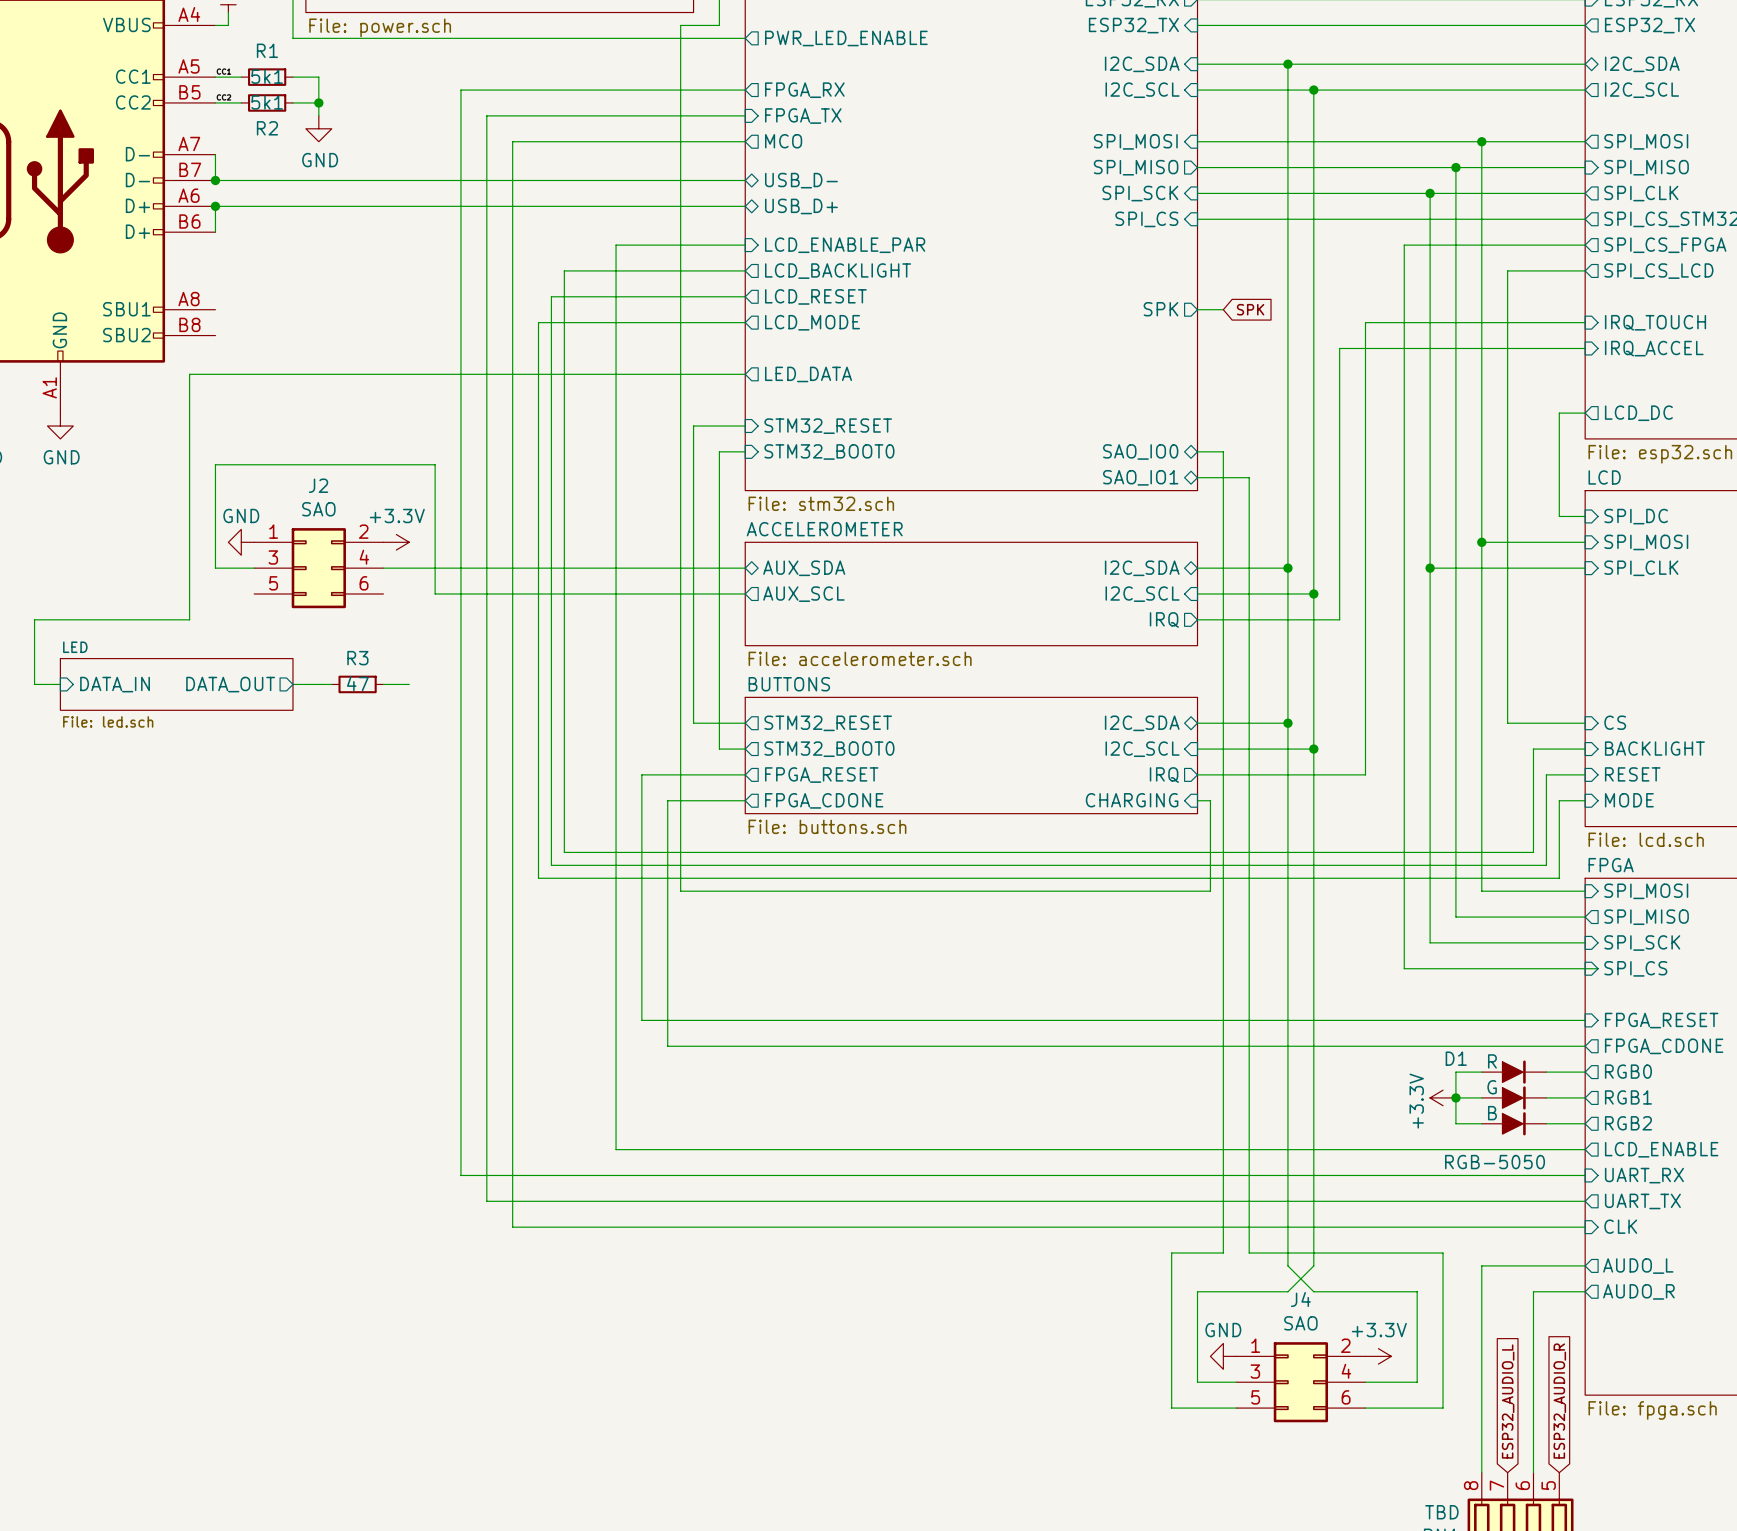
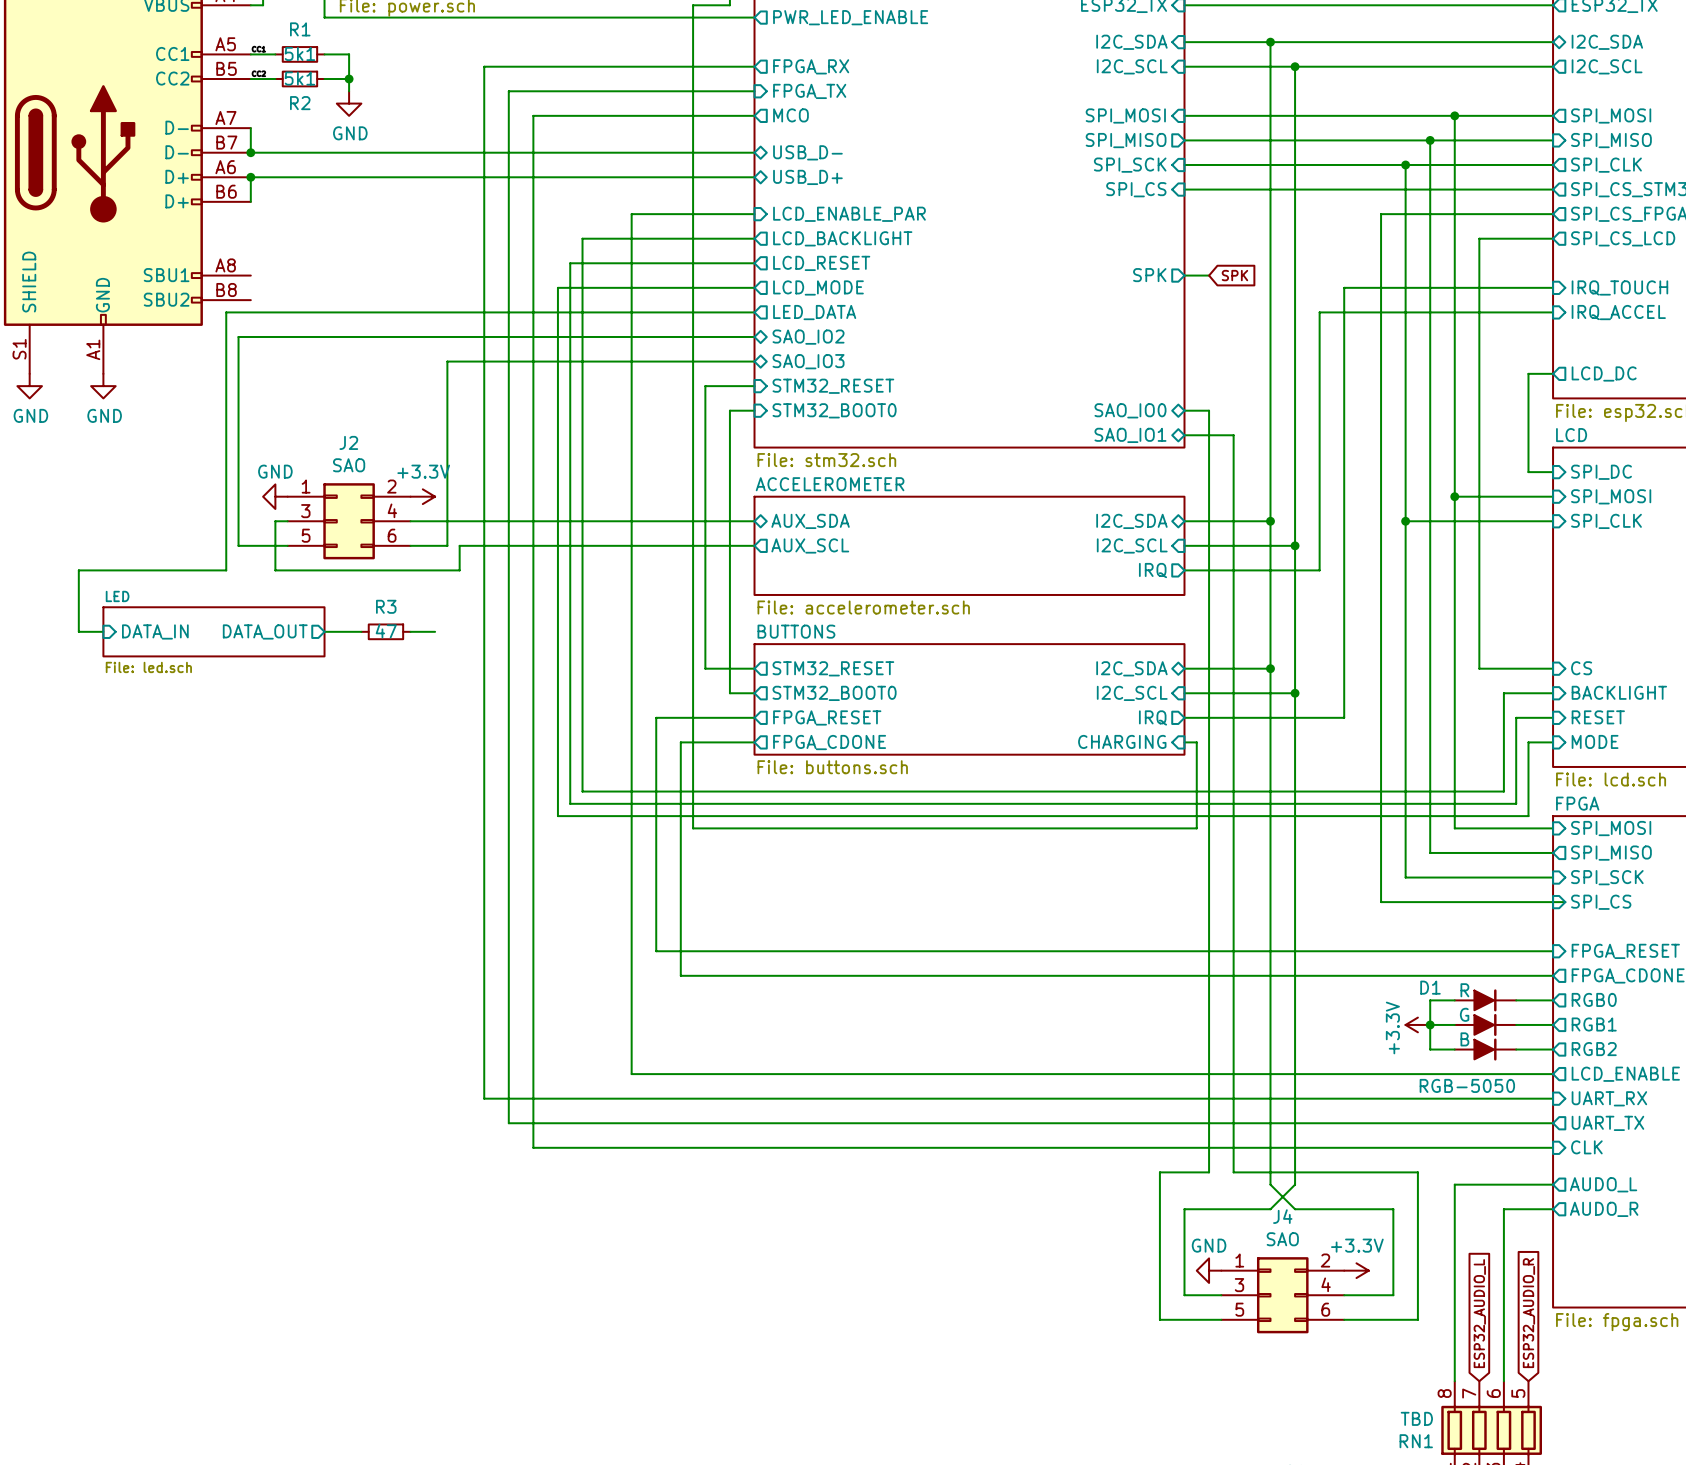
wire: none -> (754, 312) (226, 312) (226, 336)
sheet pin: none -> LED_DATA (814, 312)
wire: (189, 374) (202, 374) -> (287, 545) (238, 545) (238, 336)
sheet pin shape: output (808, 374) -> bidirectional (808, 337)
sheet pin: LED_DATA (808, 374) -> SAO_IO2 (808, 337)
wire: none -> (754, 361) (447, 361) (447, 545) (410, 545)
sheet pin: none -> SAO_IO3 (808, 361)
wire: (241, 568) (215, 568) (215, 464) (435, 464) (435, 593) -> (275, 521) (275, 570) (459, 570) (459, 545)

